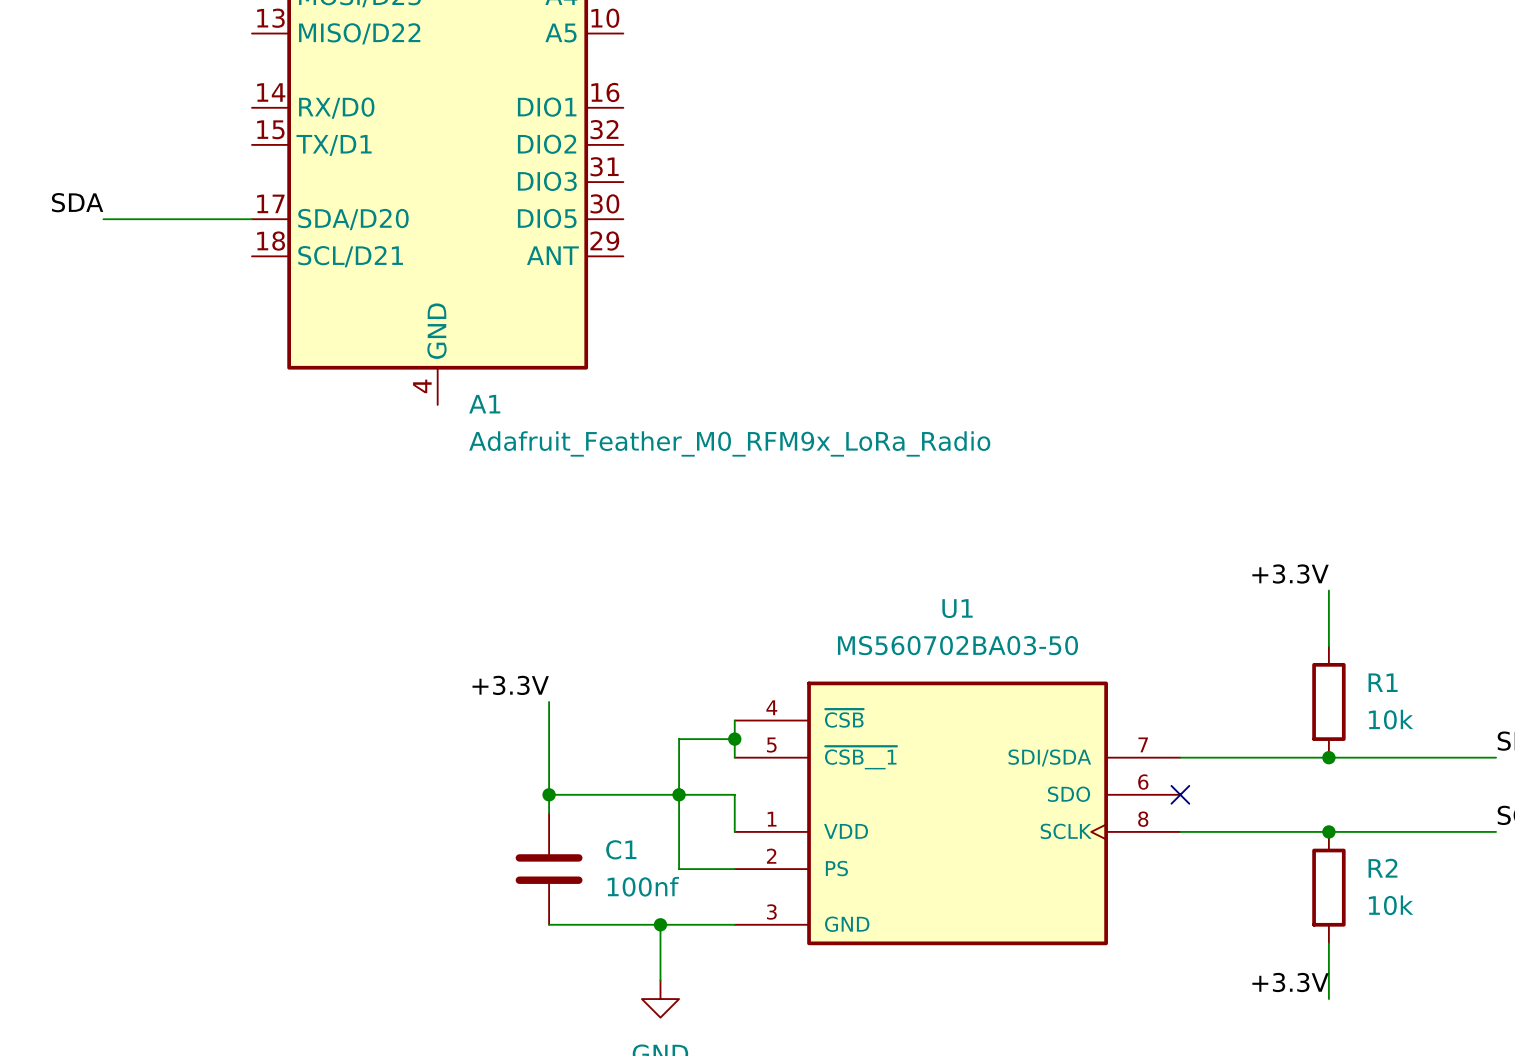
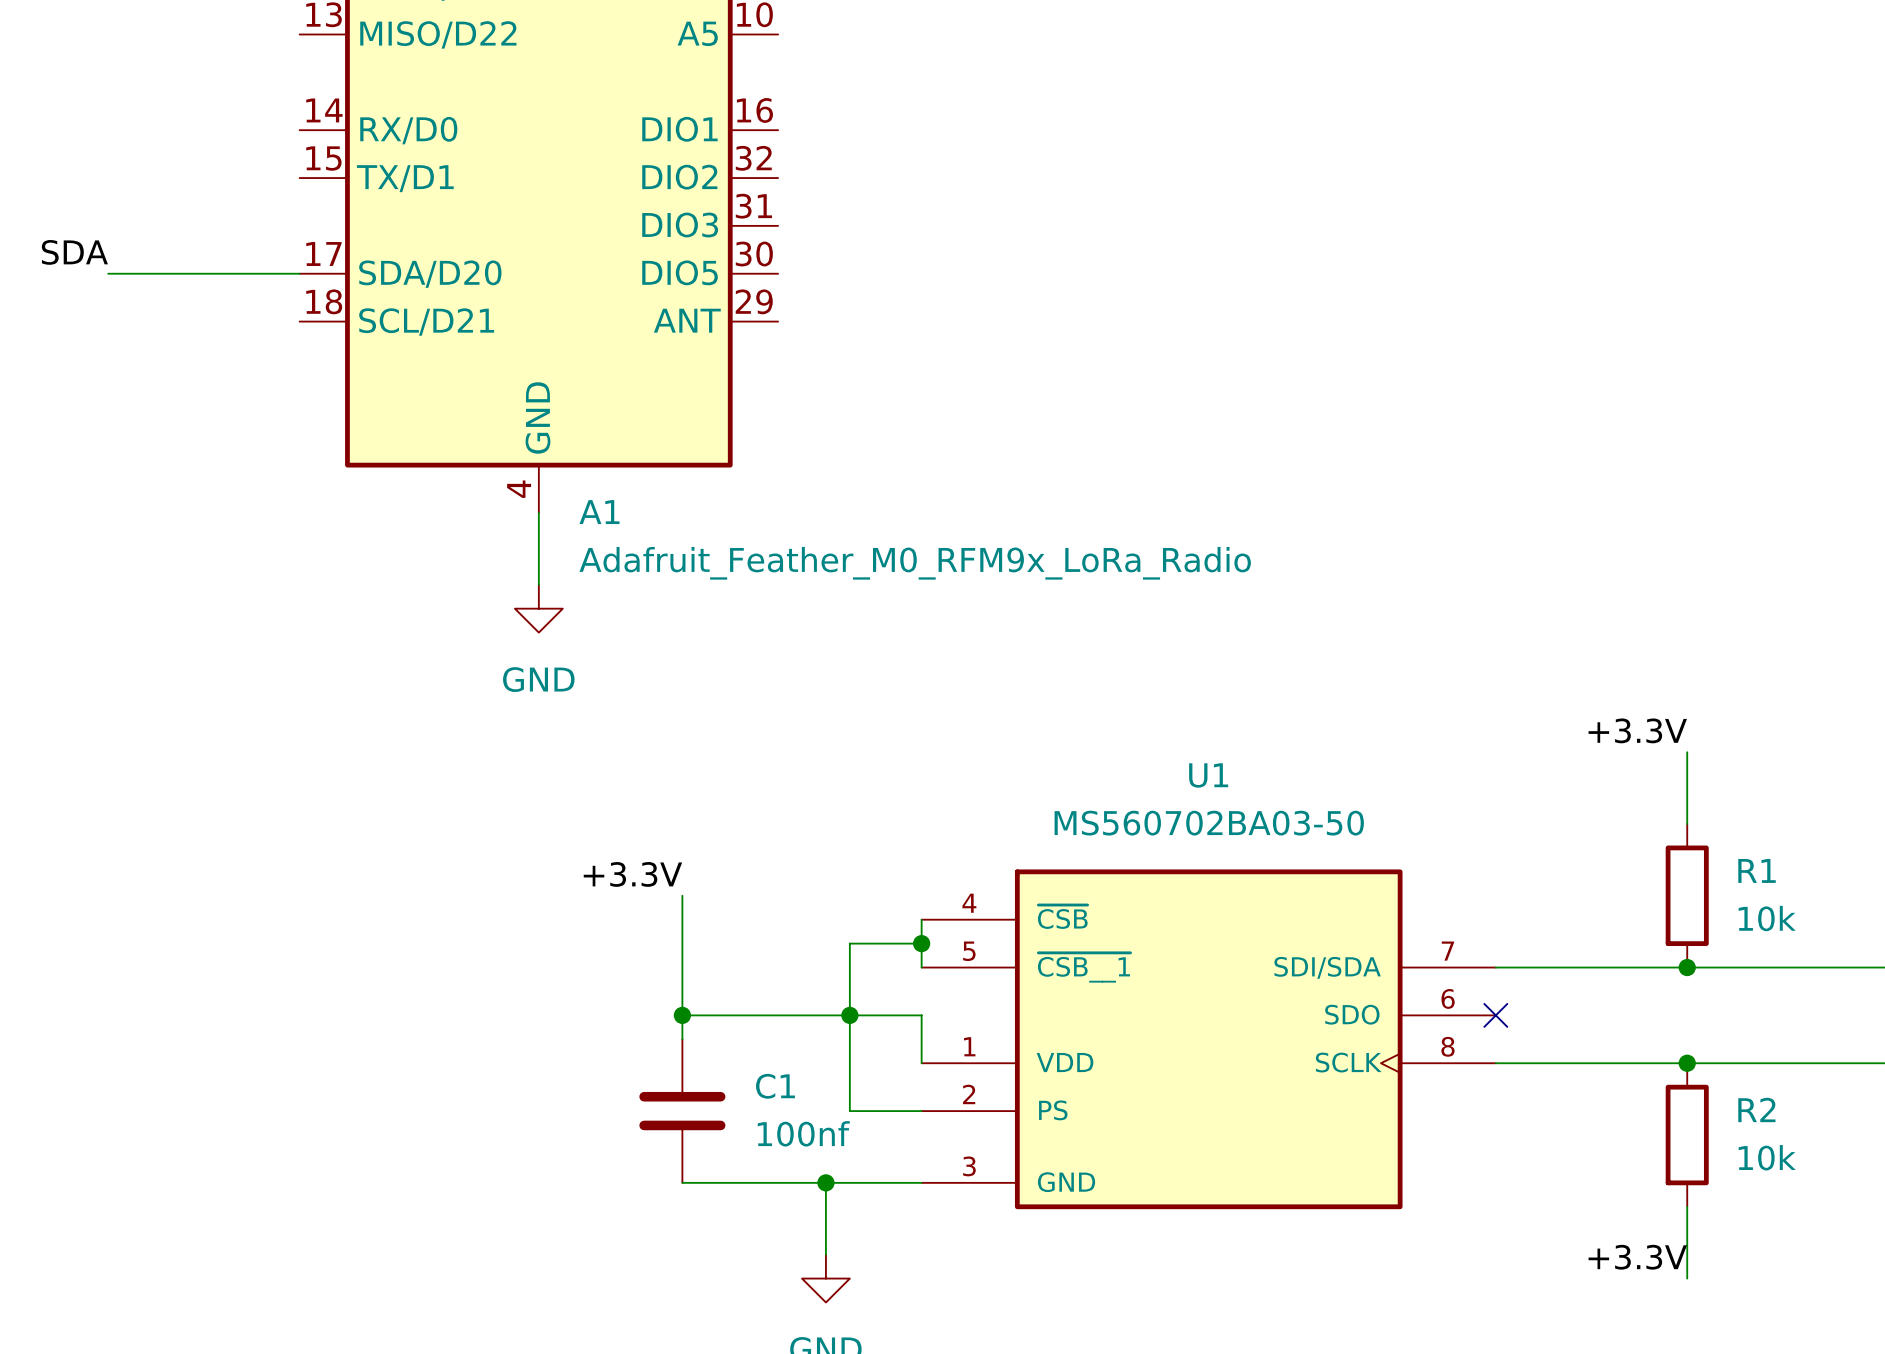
wire: none -> (538, 512) (538, 584)
power symbol: none -> GND (538, 608)

